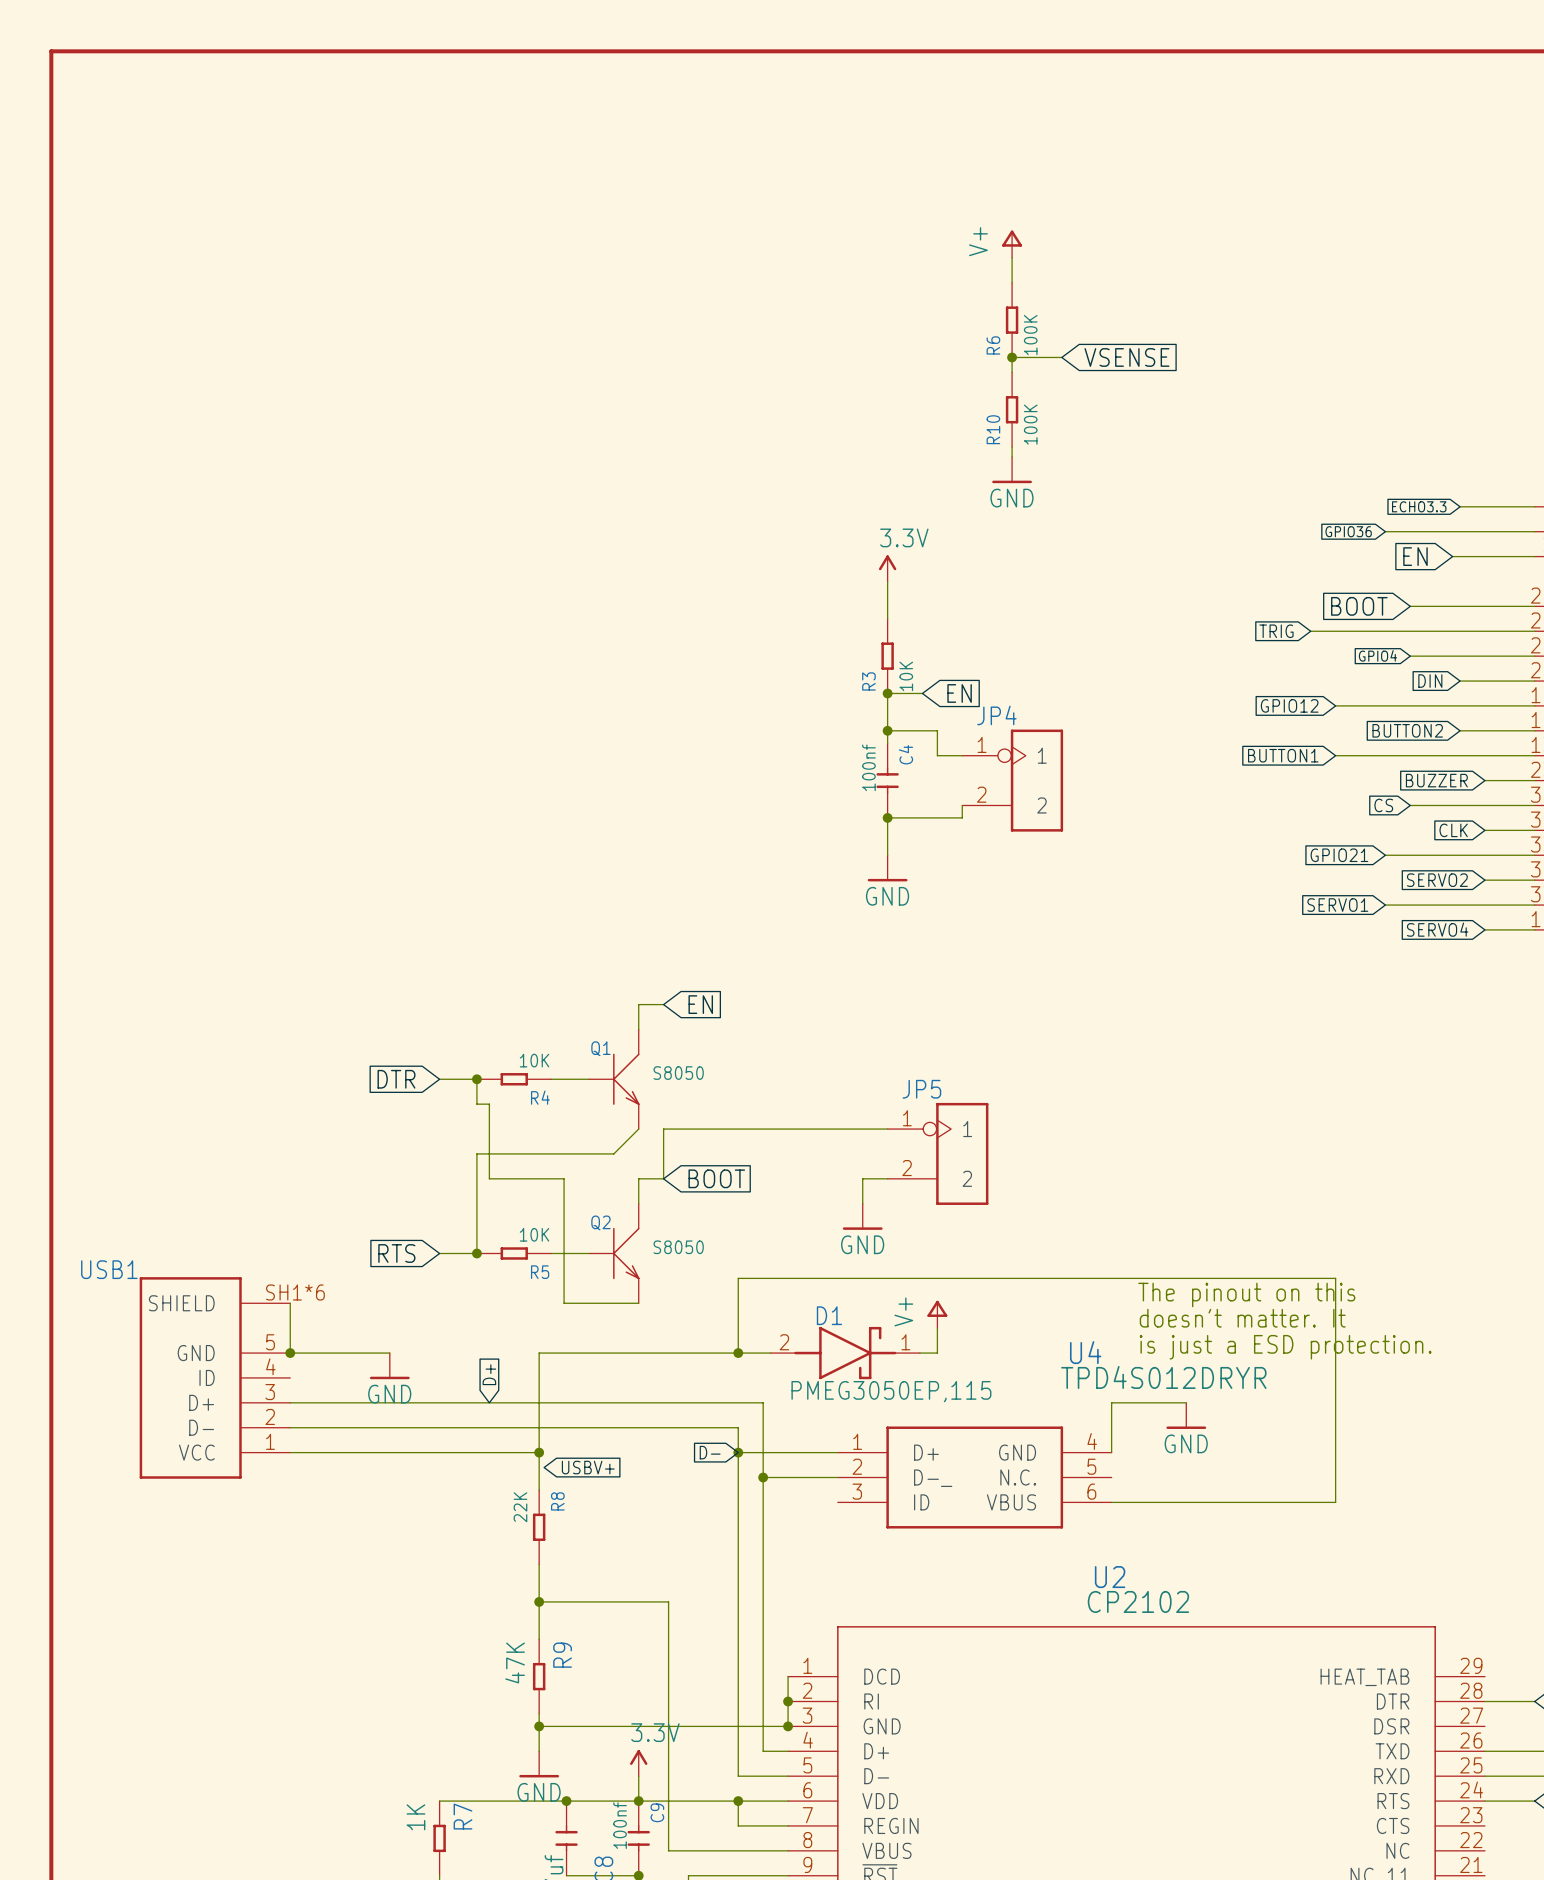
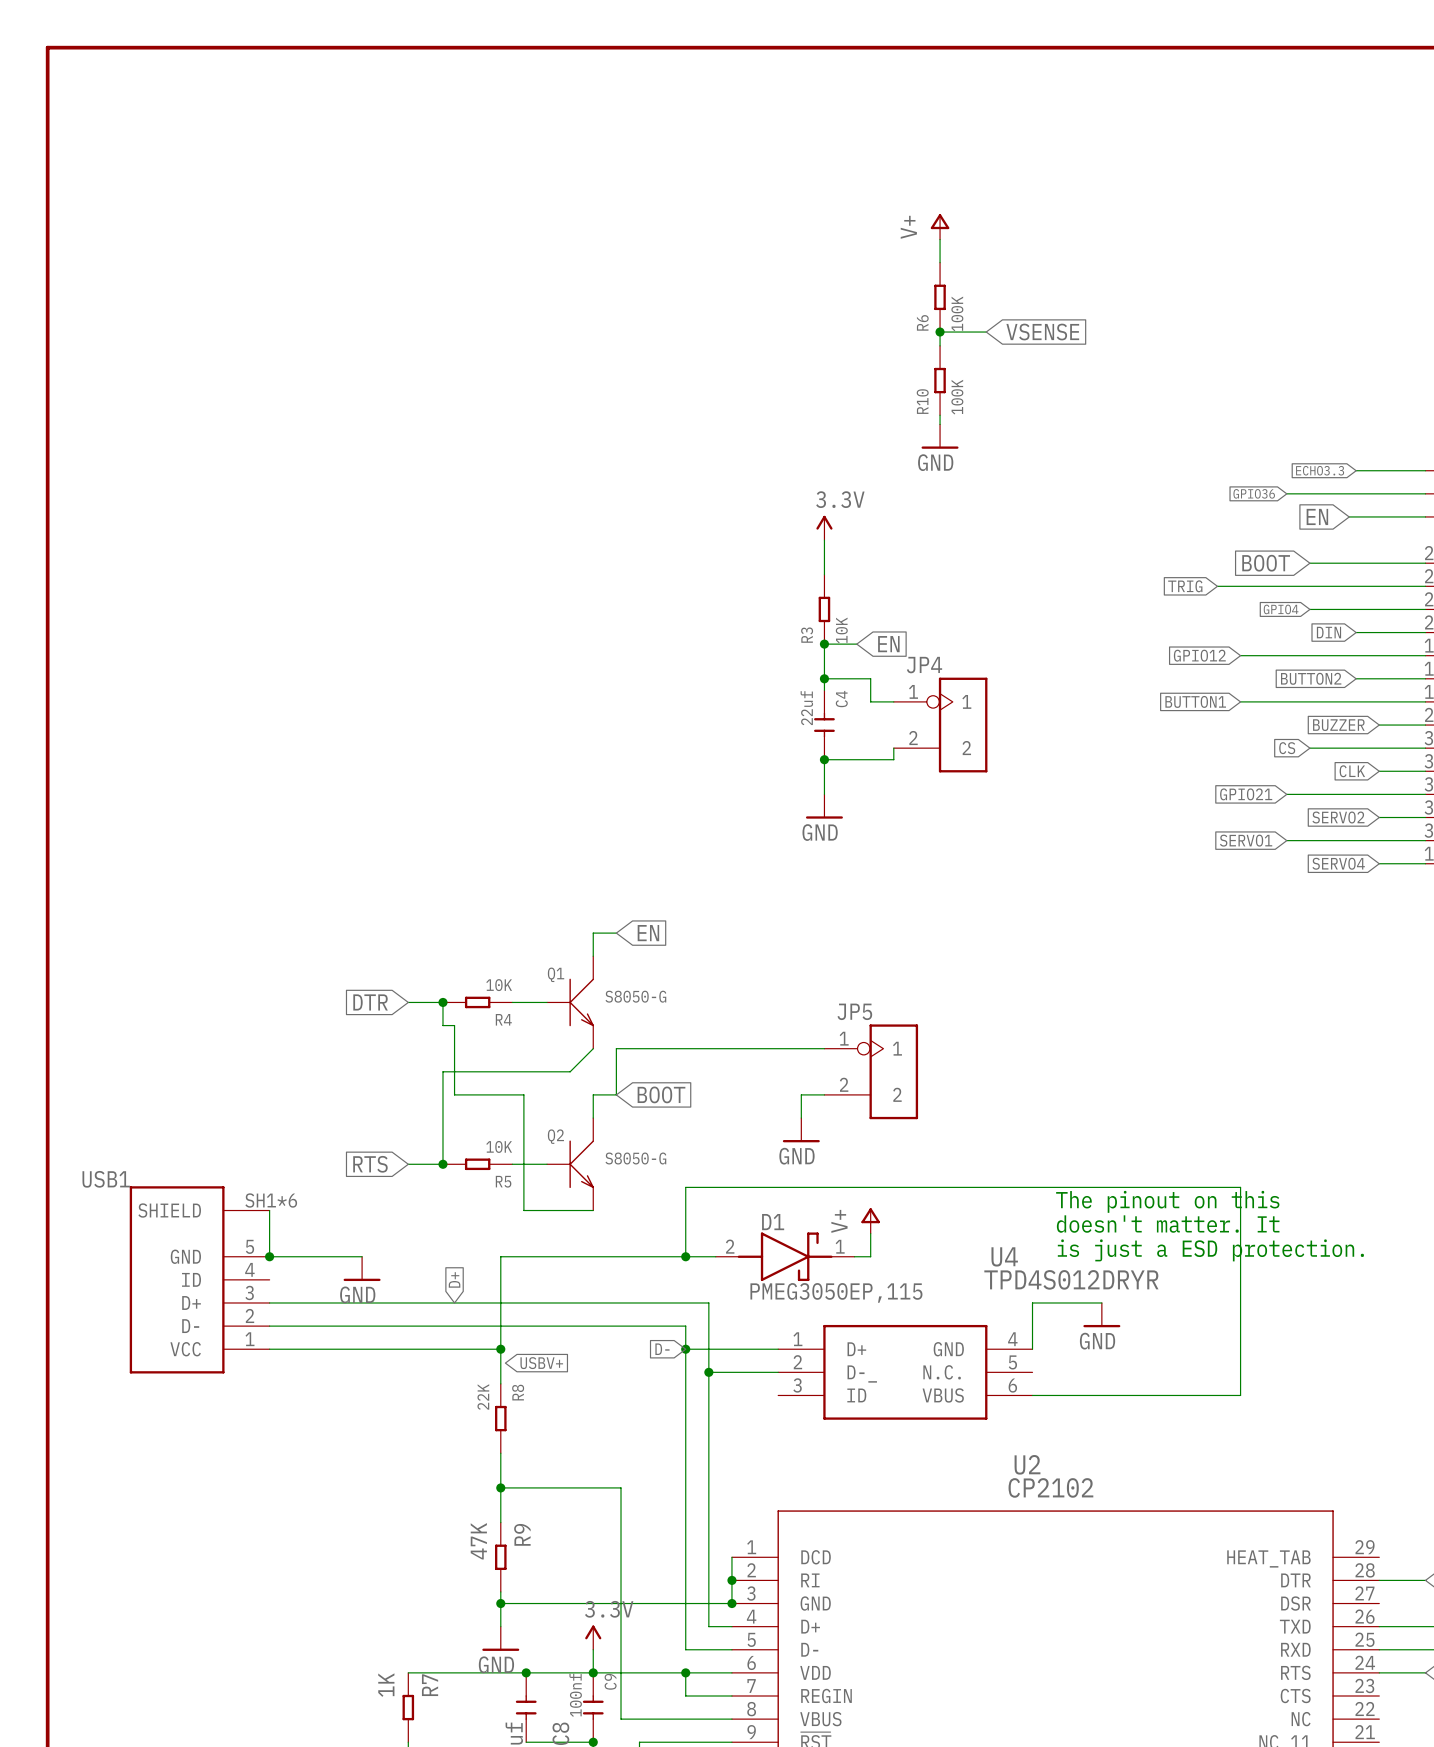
C4 value: 100nf (868, 767) -> 22uf (806, 708)
Q1 value: S8050 (678, 1073) -> S8050-G (635, 996)
Q2 value: S8050 (678, 1247) -> S8050-G (635, 1158)

